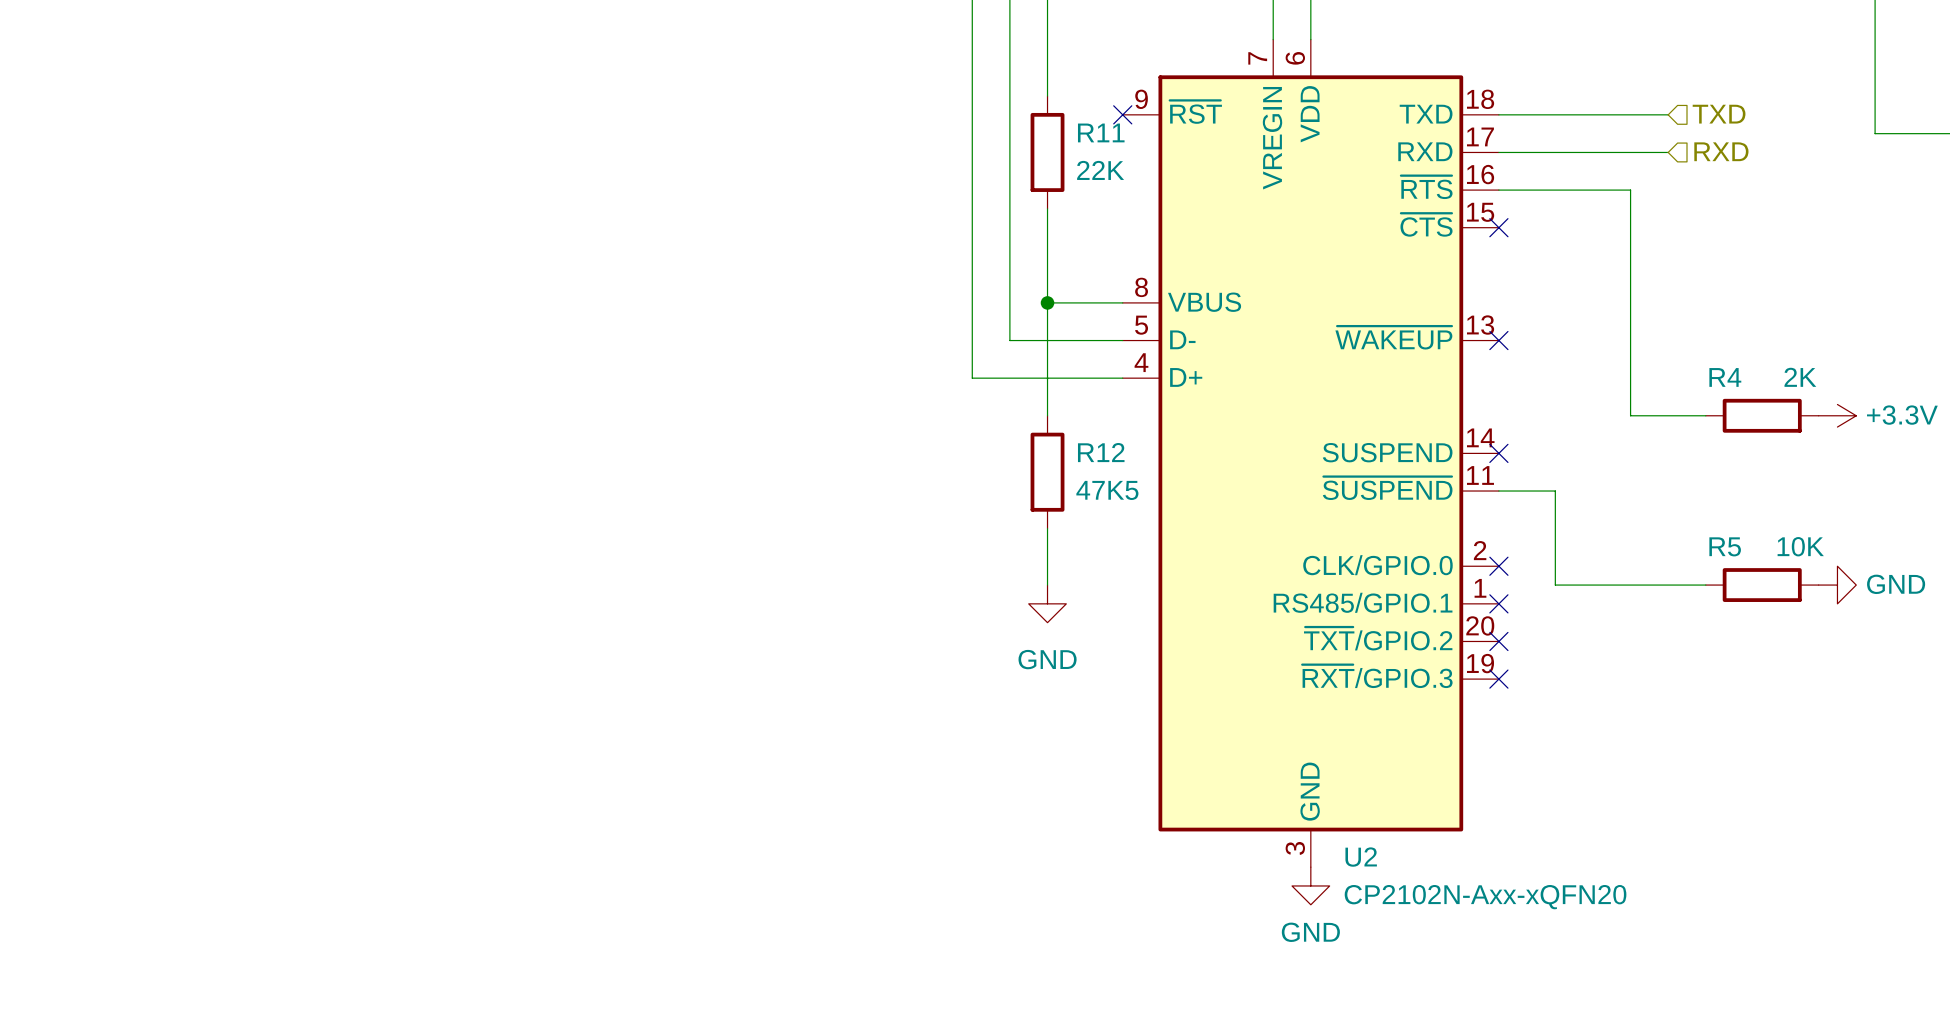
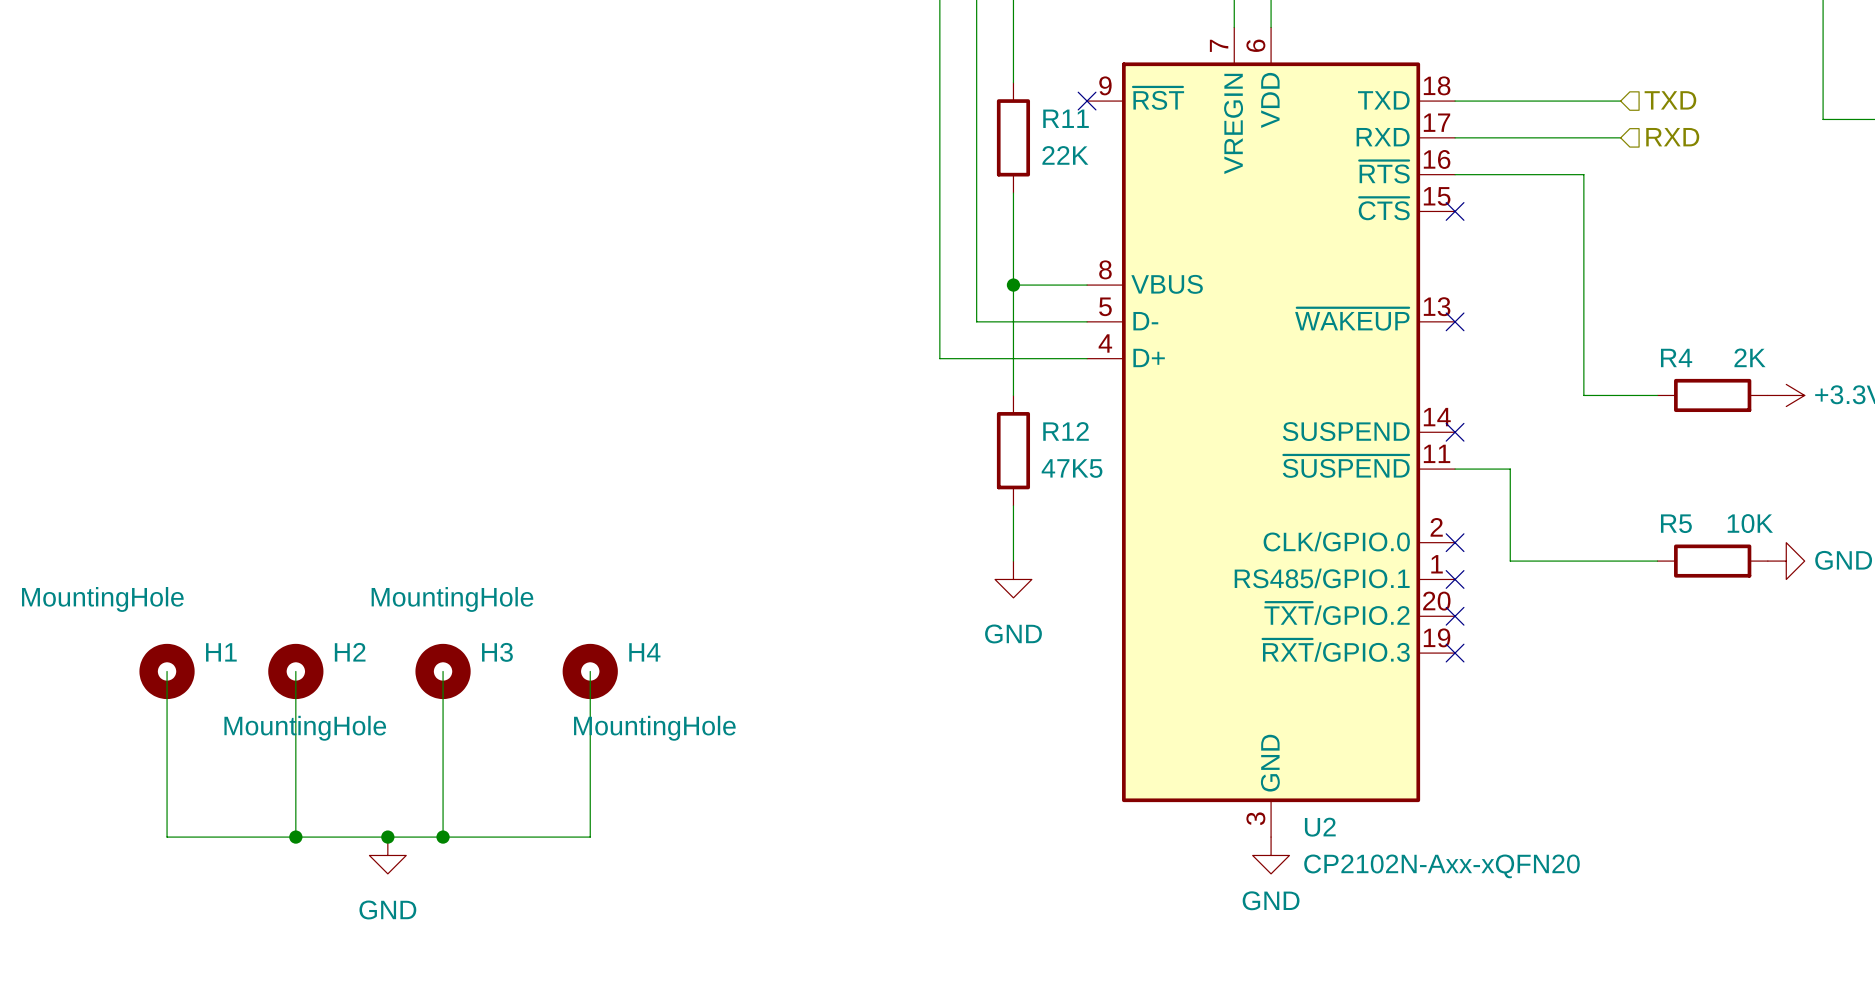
wire: none -> (167, 671) (167, 837) (590, 837) (590, 671)
H1: none -> MountingHole (167, 671)
wire: none -> (295, 671) (295, 837)
H2: none -> MountingHole (295, 671)
wire: none -> (443, 671) (443, 837)
H3: none -> MountingHole (443, 671)
H4: none -> MountingHole (590, 671)
junction: none -> (295, 837)
junction: none -> (387, 837)
junction: none -> (443, 837)
power symbol: none -> GND (387, 855)

